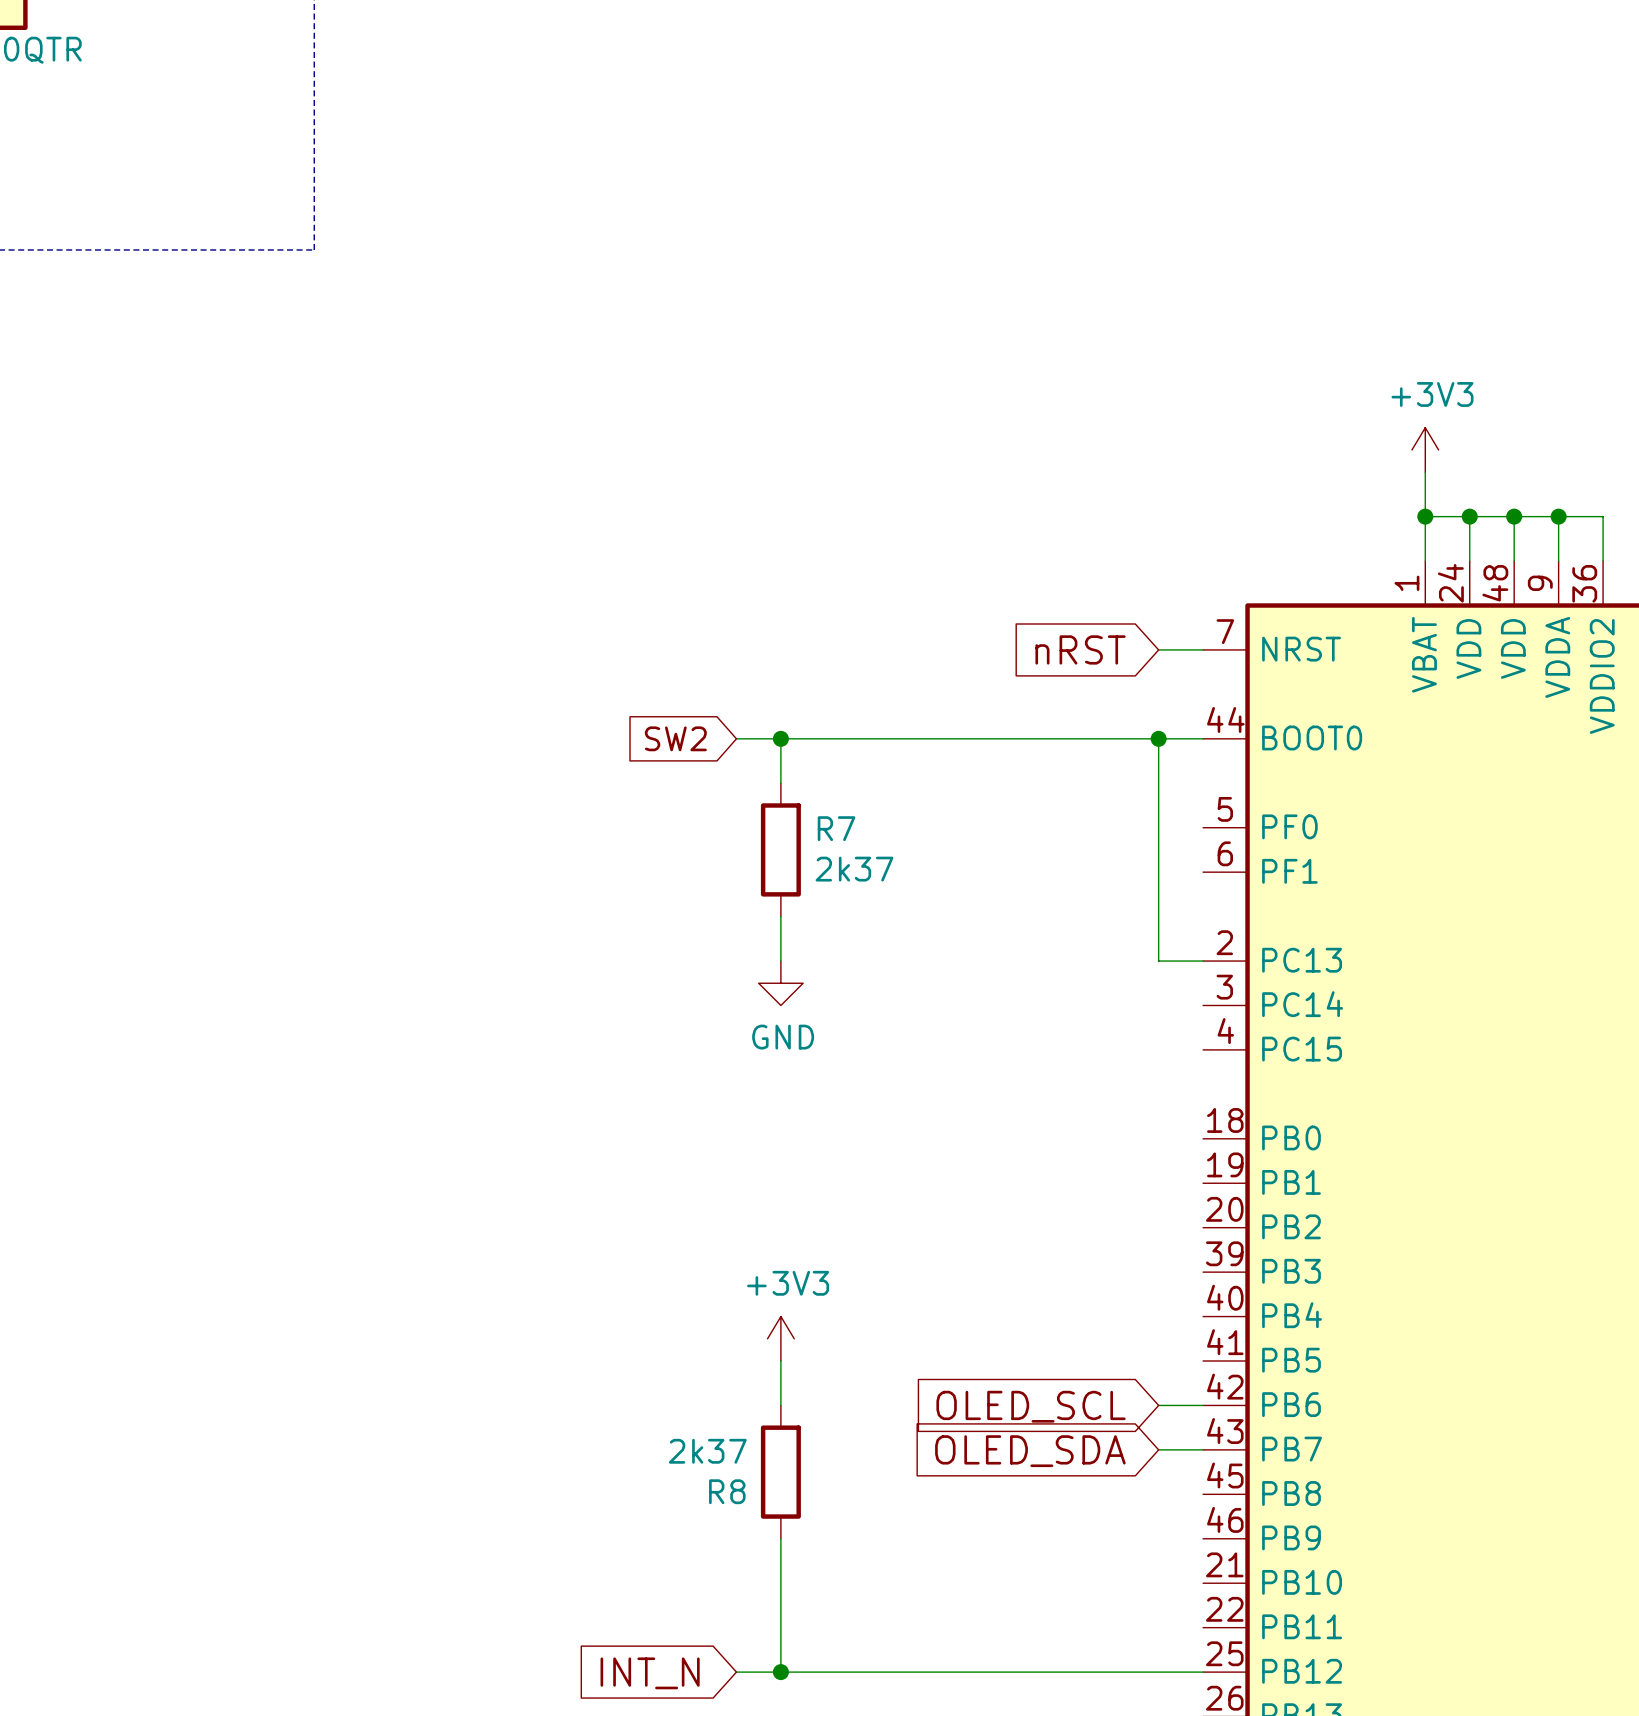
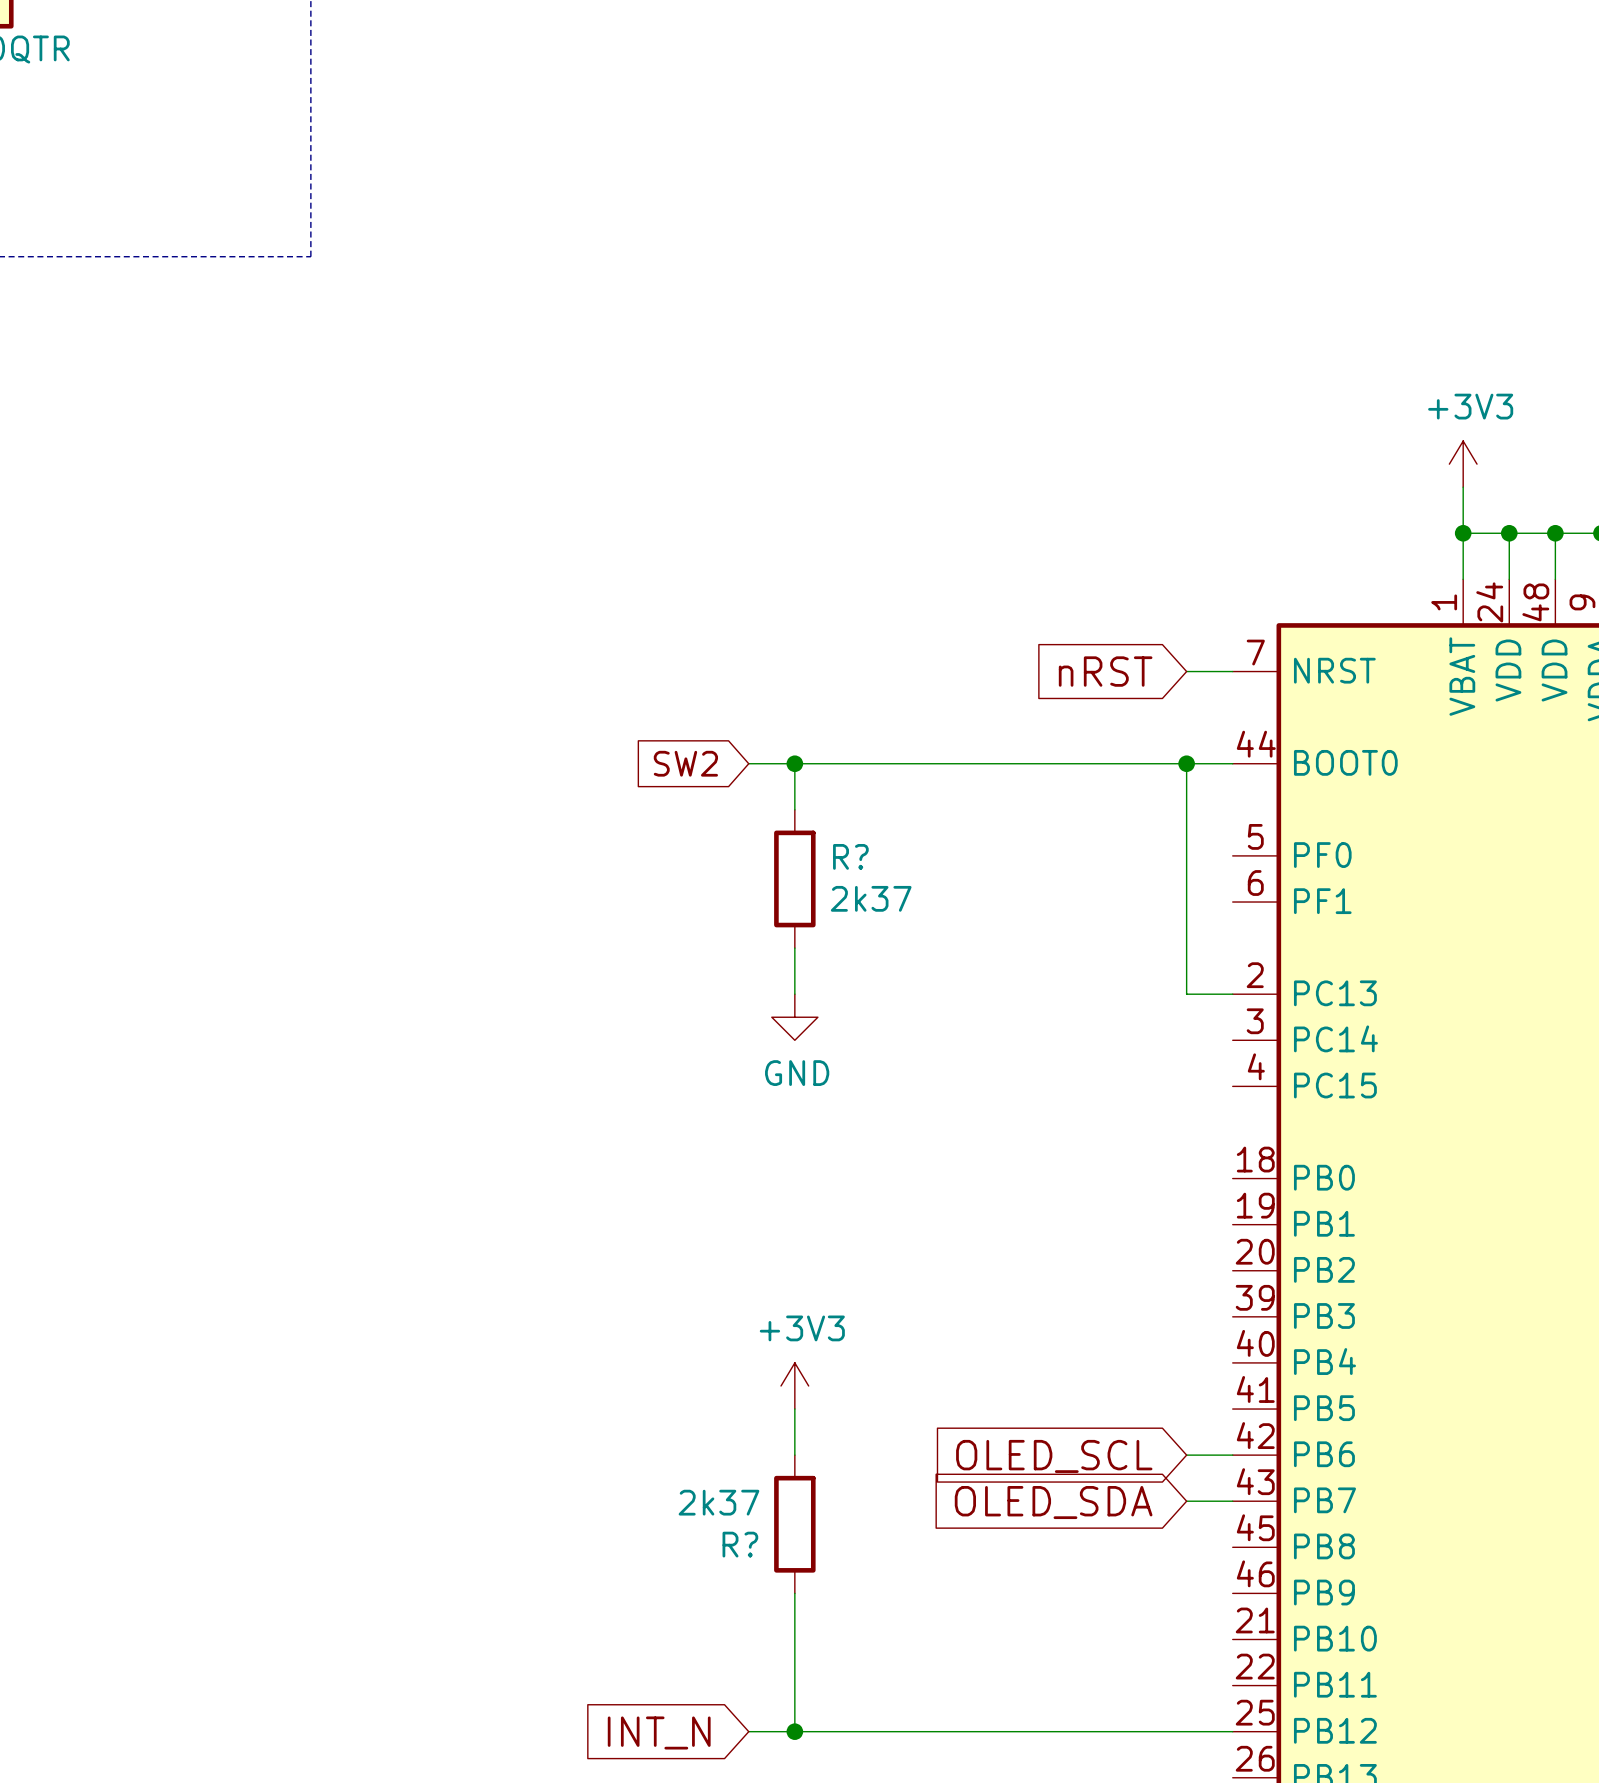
R7 name: R7 (836, 828) -> R? (850, 856)
R8 name: R8 (727, 1491) -> R? (740, 1544)

